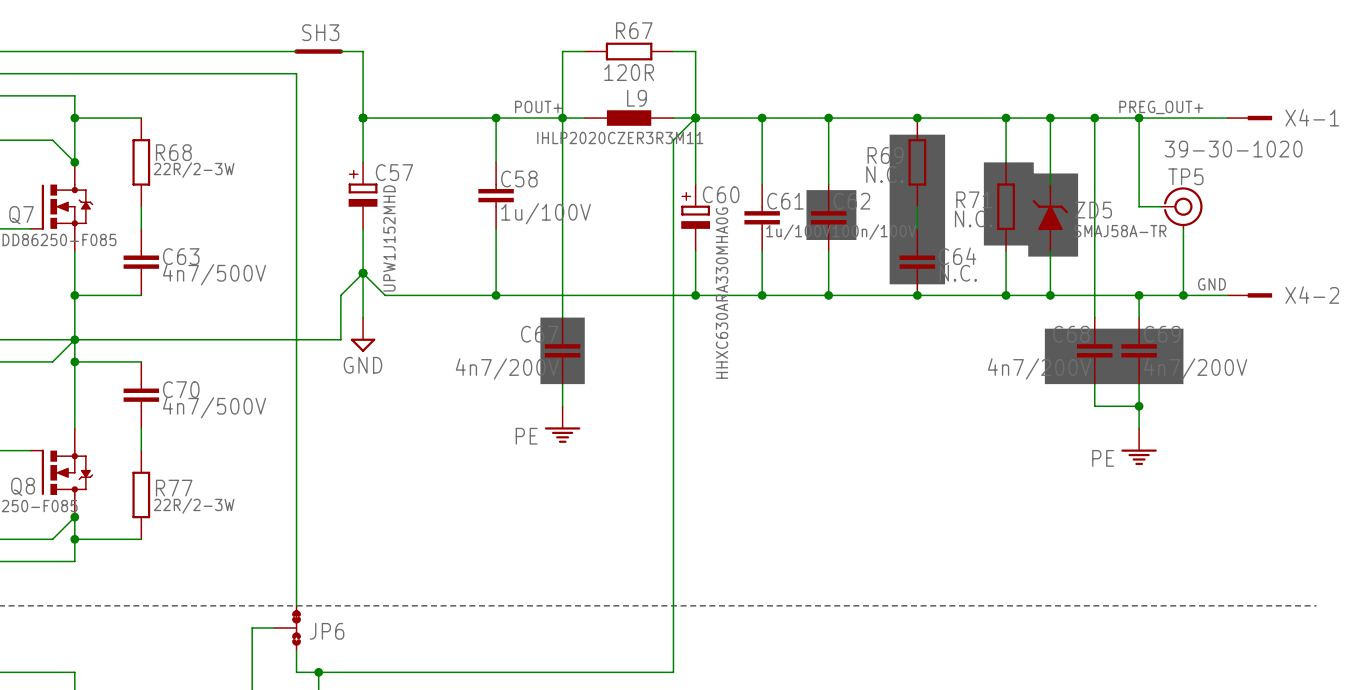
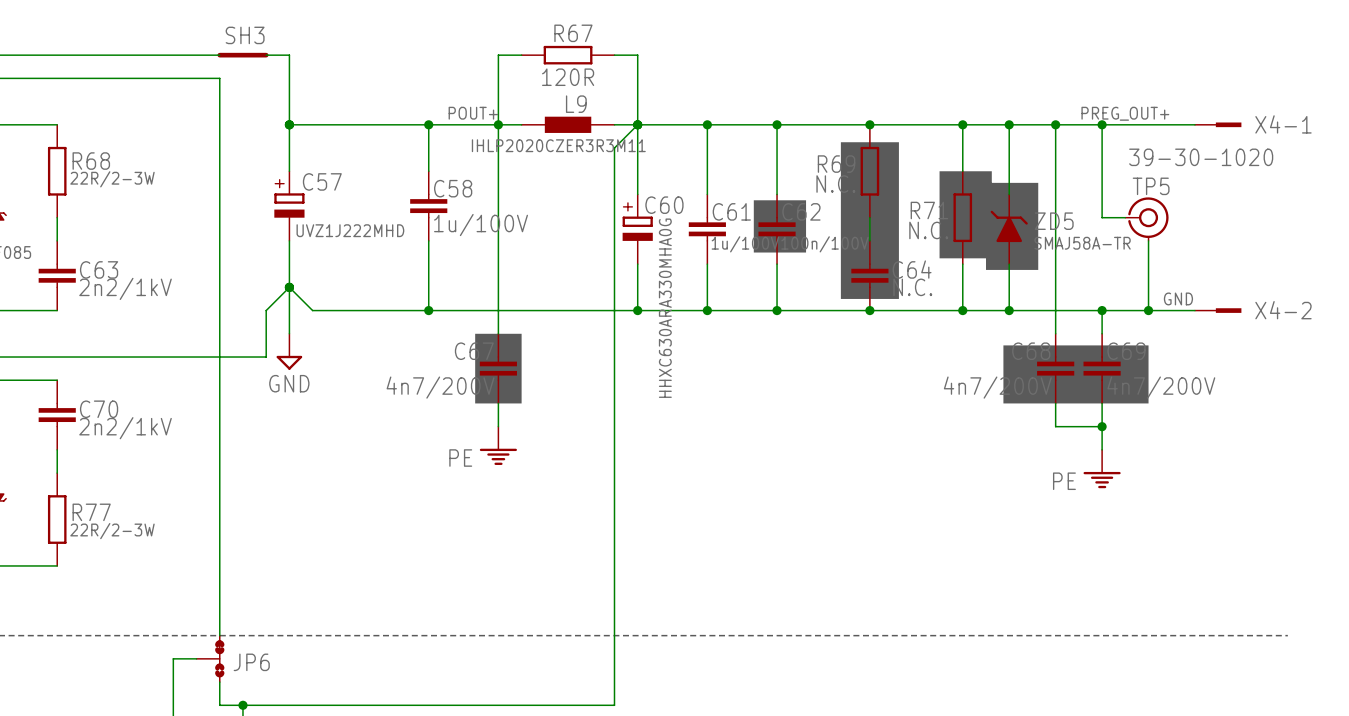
C57 value: UPW1J152MHD (389, 238) -> UVZ1J222MHD (350, 230)
C63 value: 4n7/500V (214, 274) -> 2n2/1kV (125, 288)
C70 value: 4n7/500V (214, 407) -> 2n2/1kV (125, 428)

